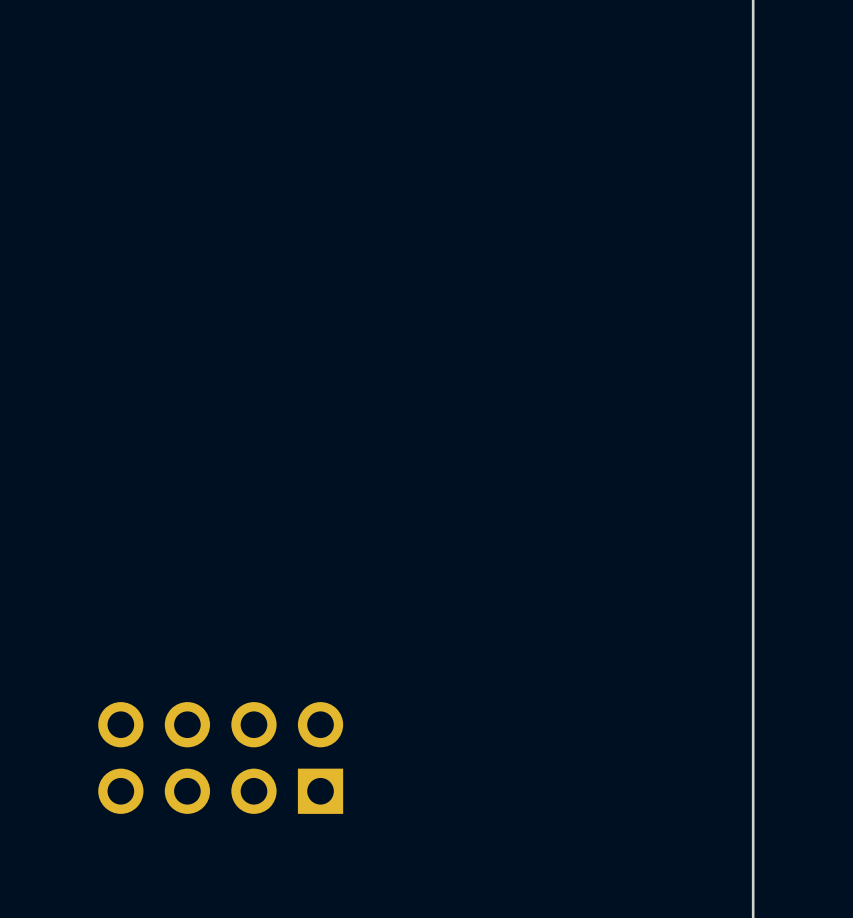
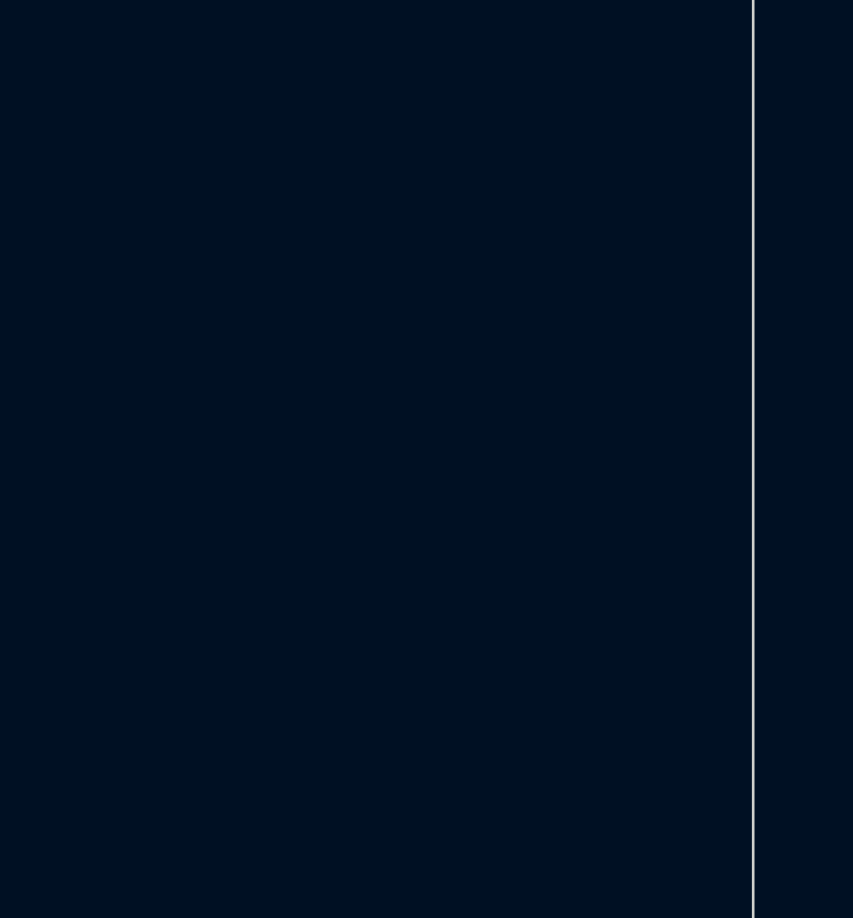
part: (220, 757) -> none

